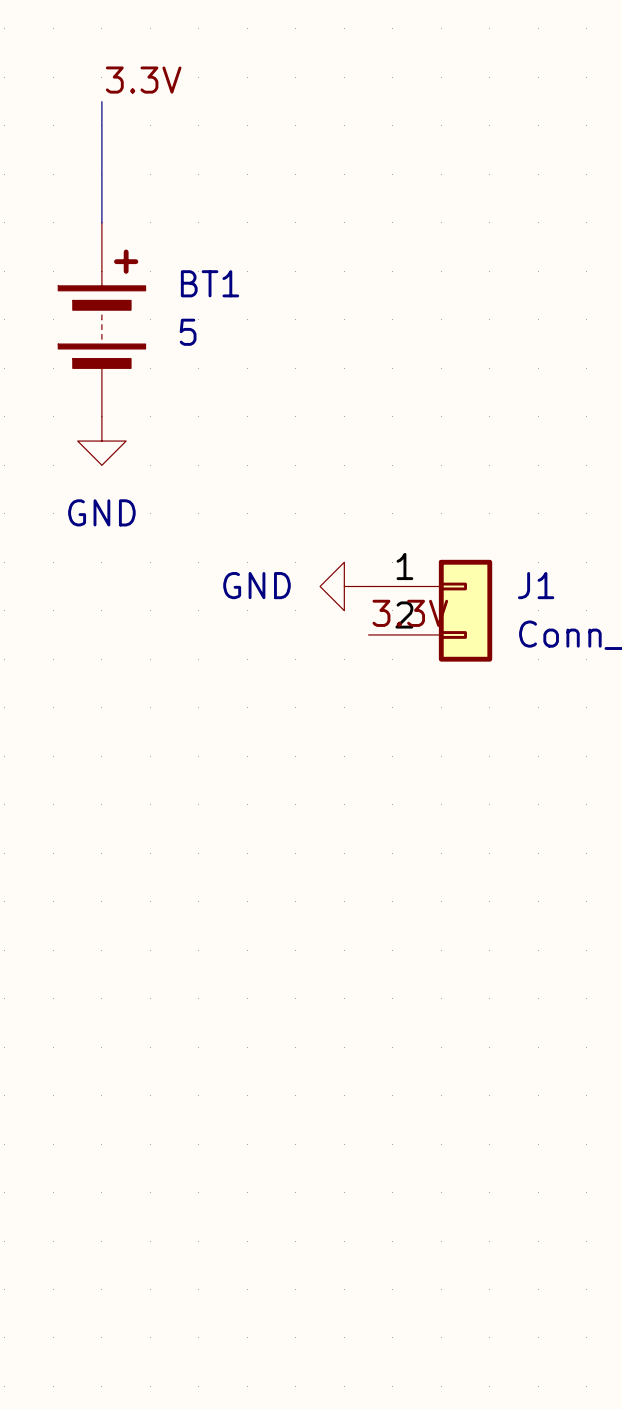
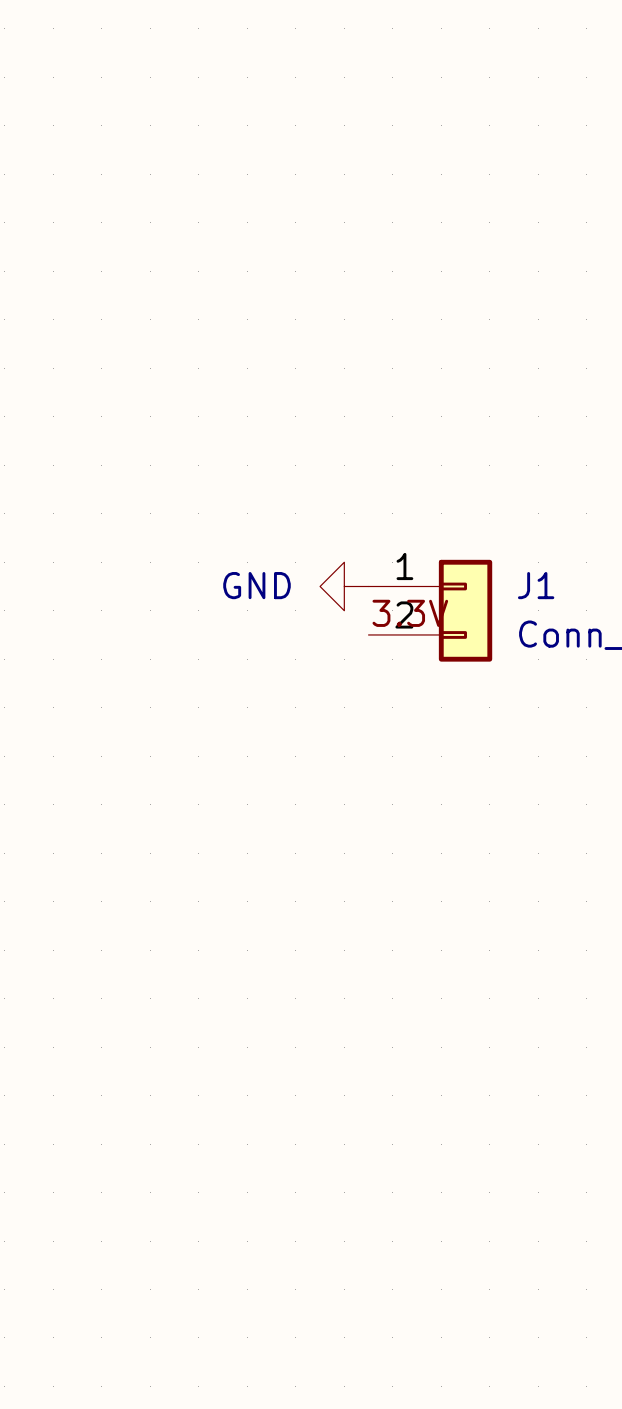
label: 3.3V (143, 80) -> none
wire: (101, 101) (101, 222) -> none
BT1: 5 (101, 319) -> none
power symbol: GND (101, 441) -> none

